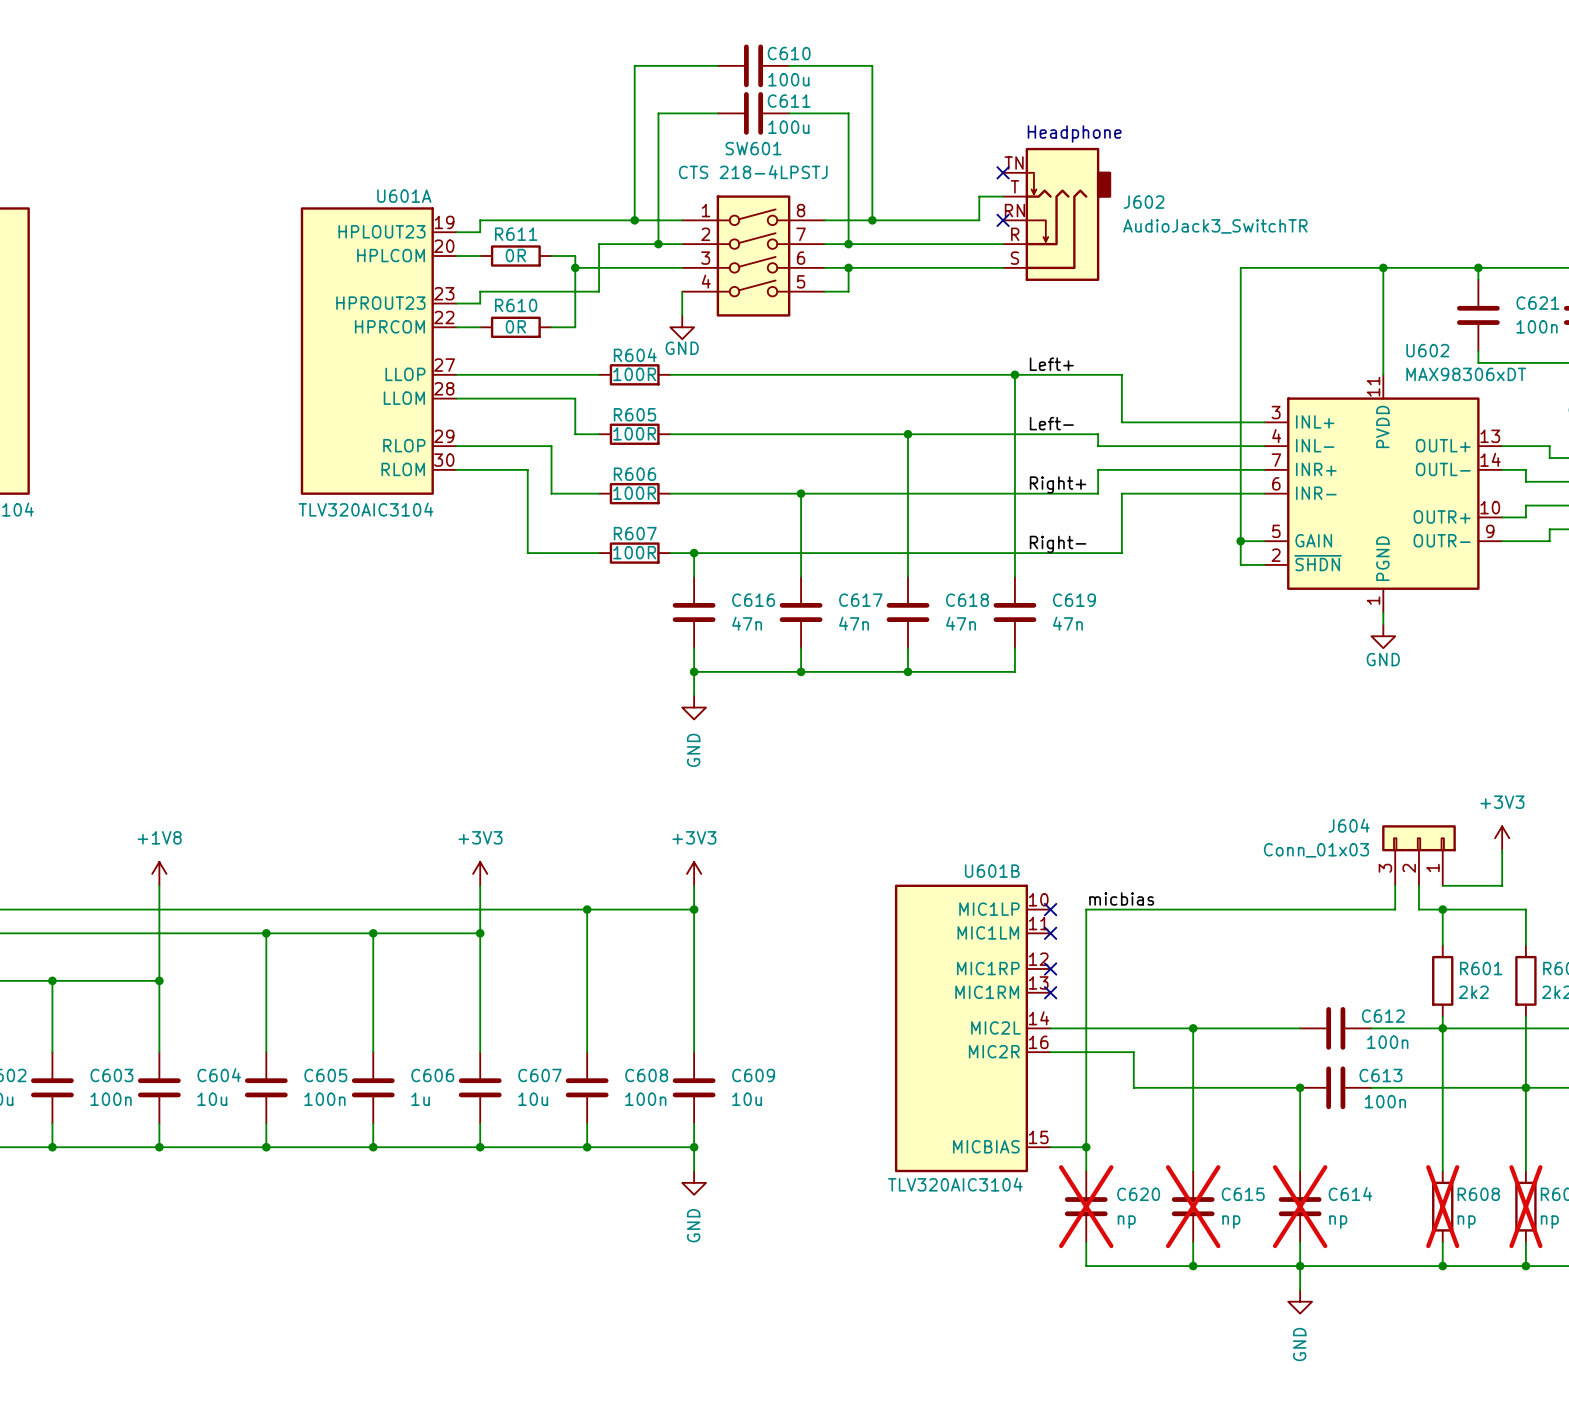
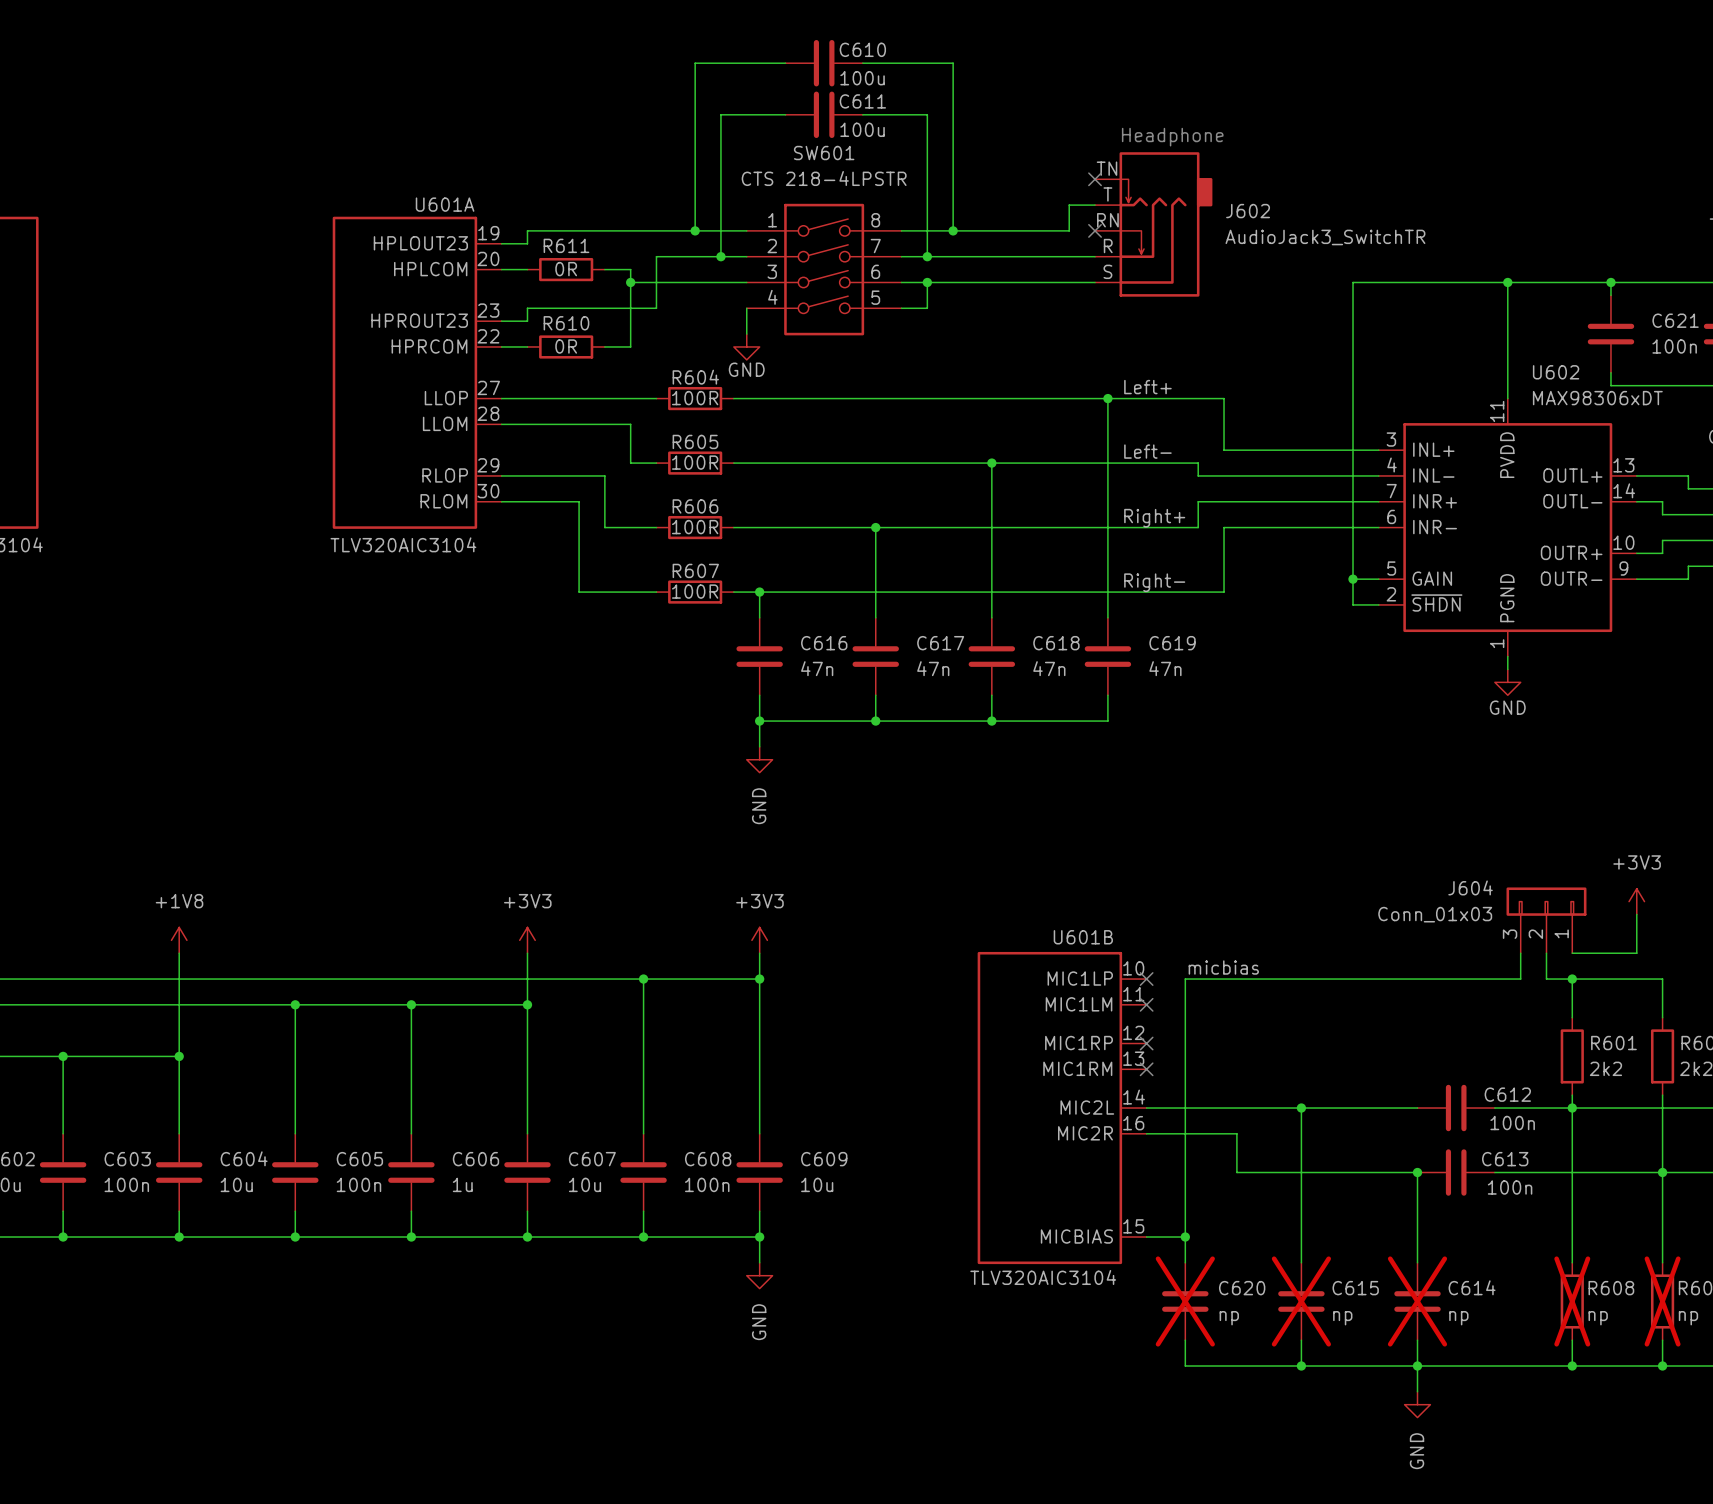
SW601 value: CTS 218-4LPSTJ (753, 172) -> CTS 218-4LPSTR (824, 178)

